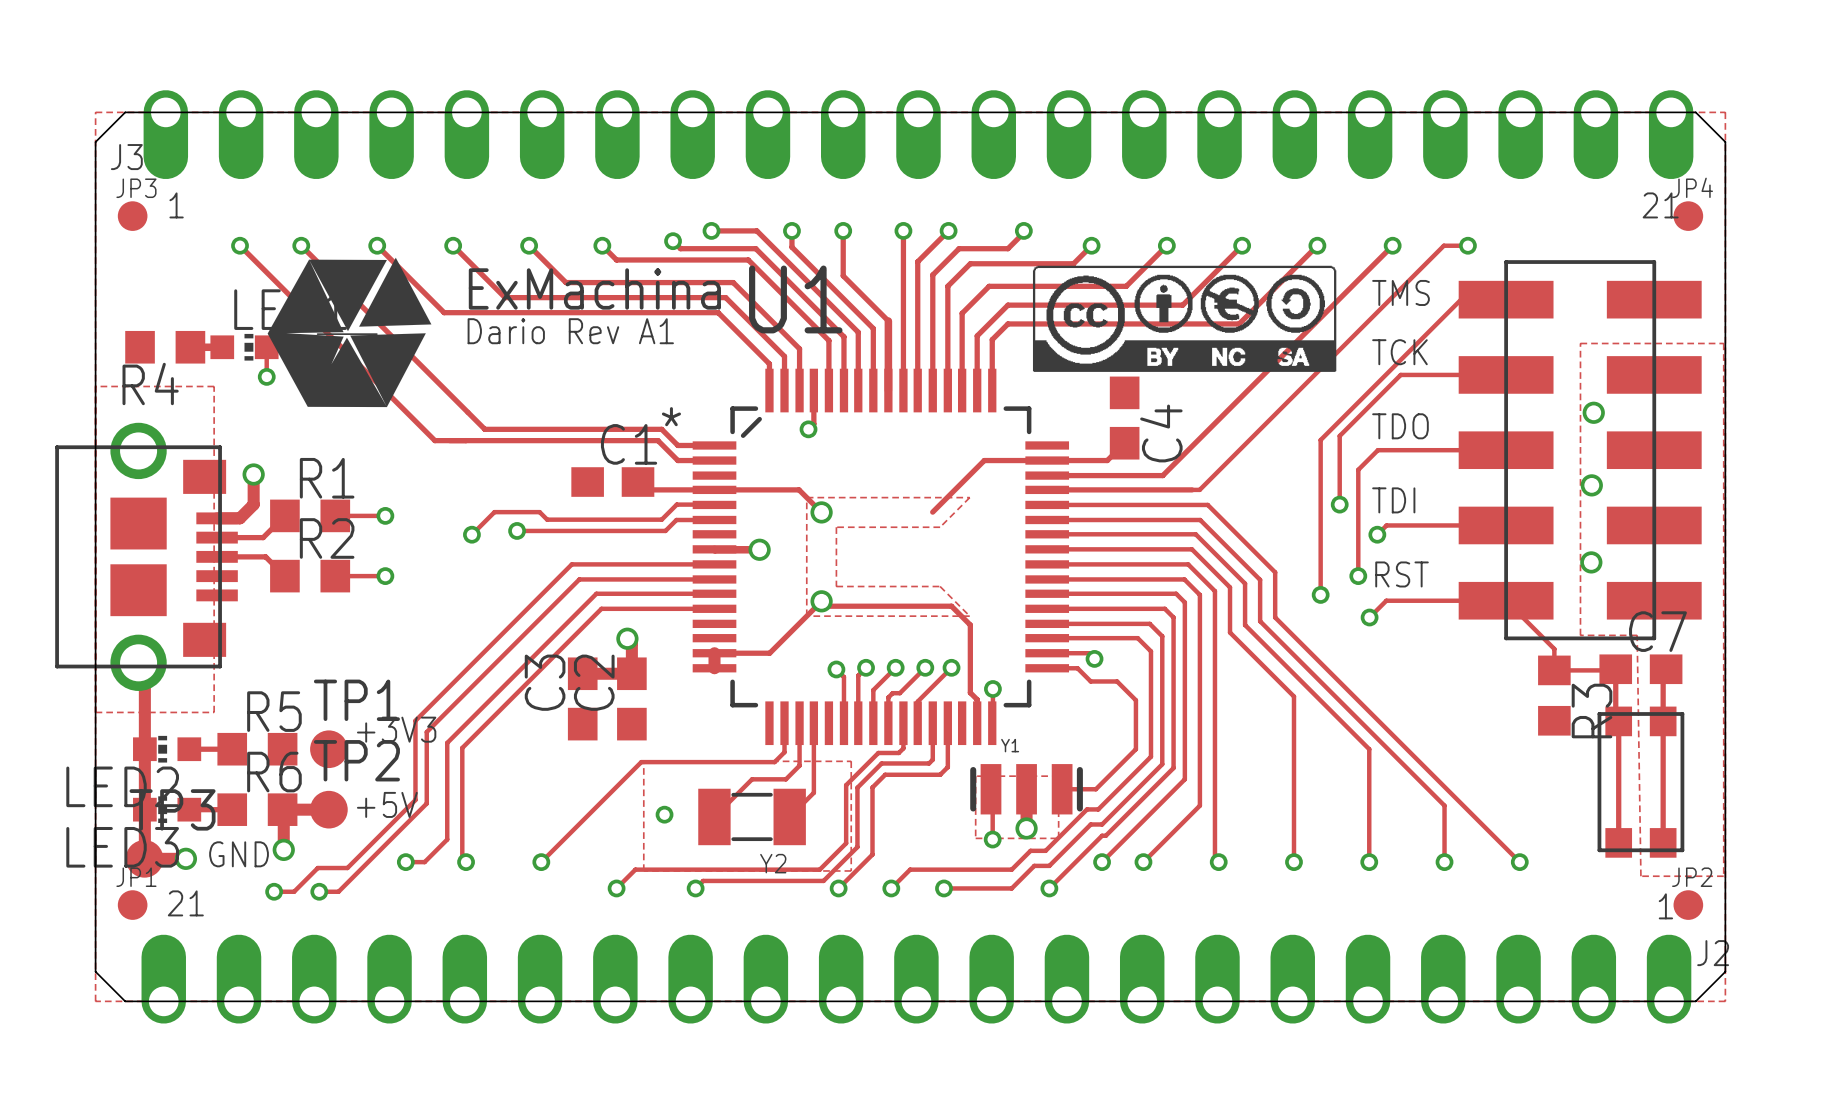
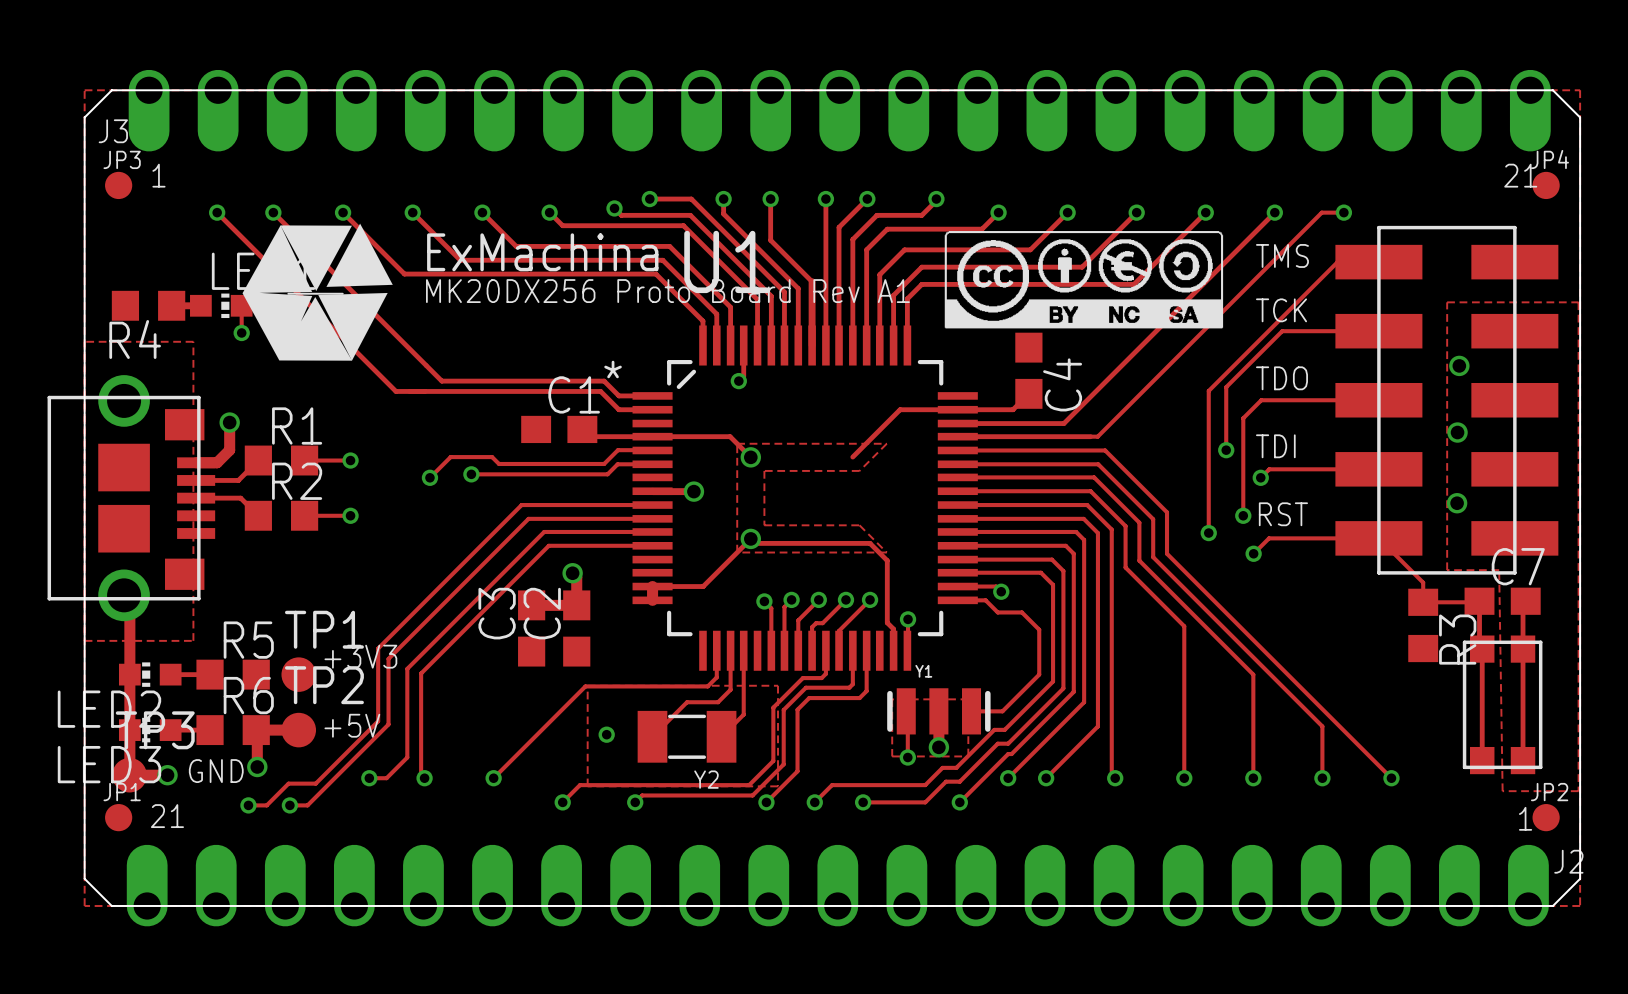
text: Dario Rev A1 (570, 331) -> MK20DX256 Proto Board Rev A1 (667, 291)

